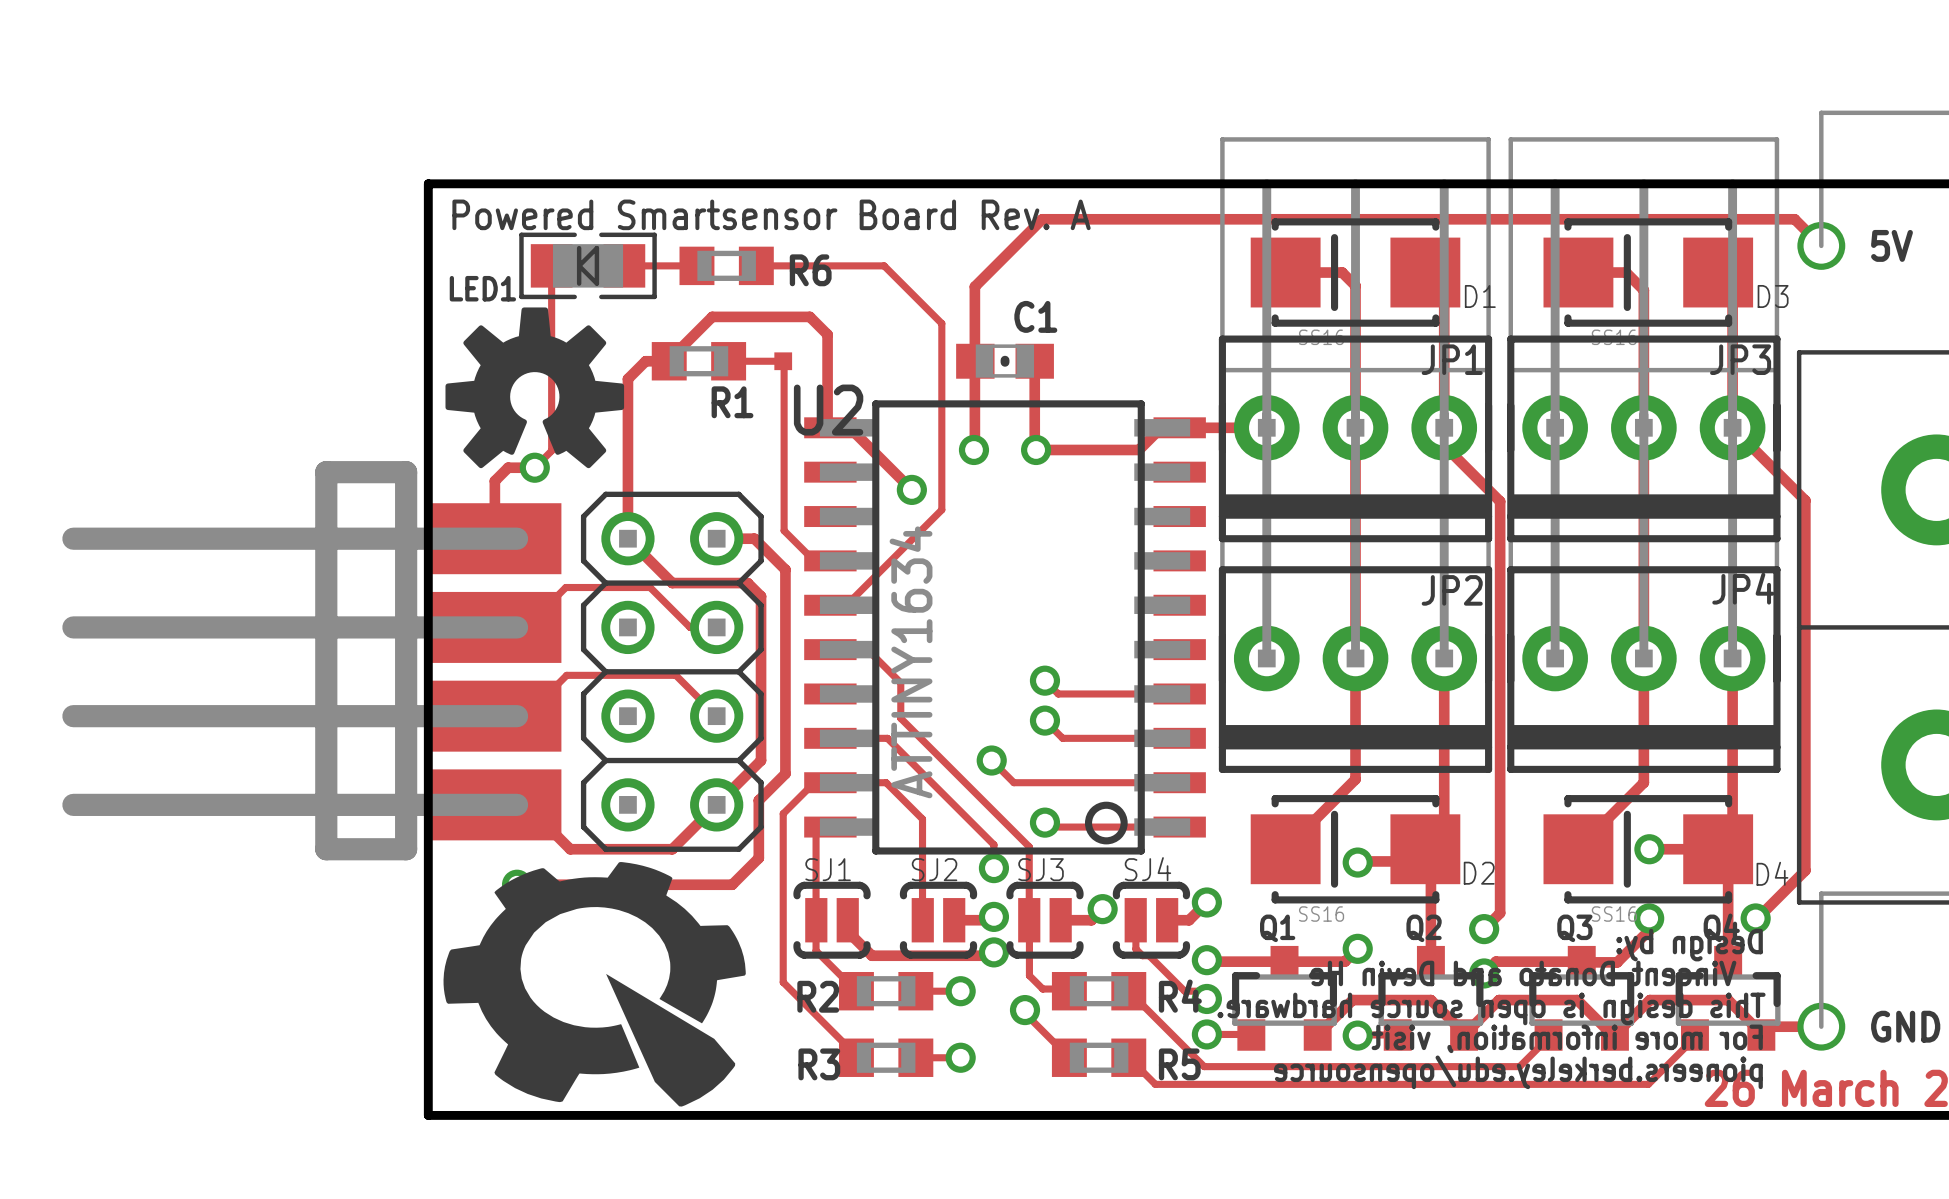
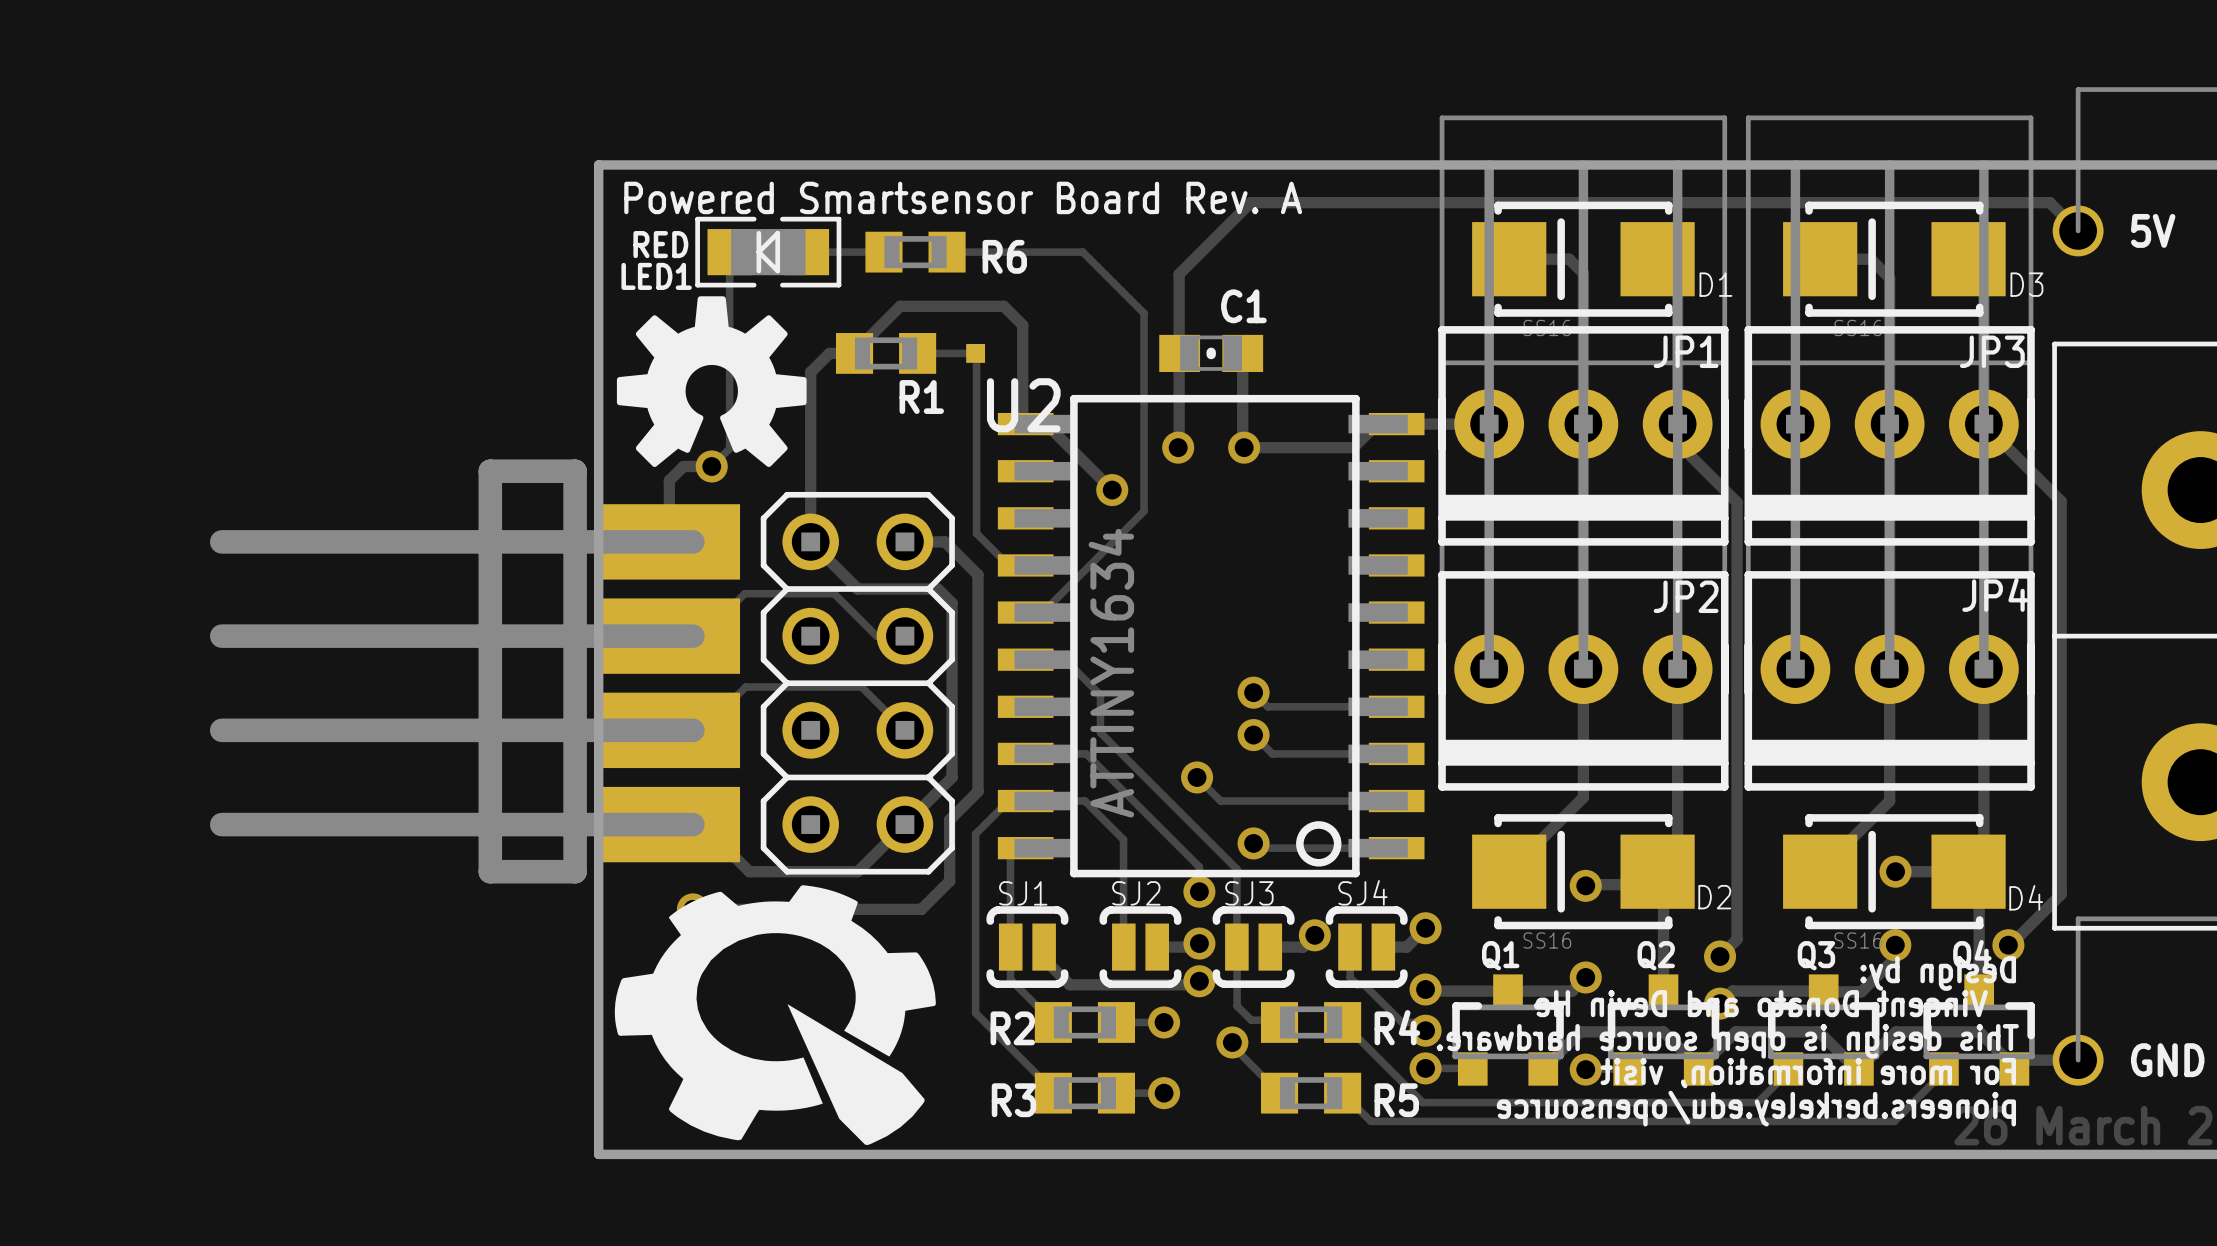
LED1 value: none -> RED (660, 244)

